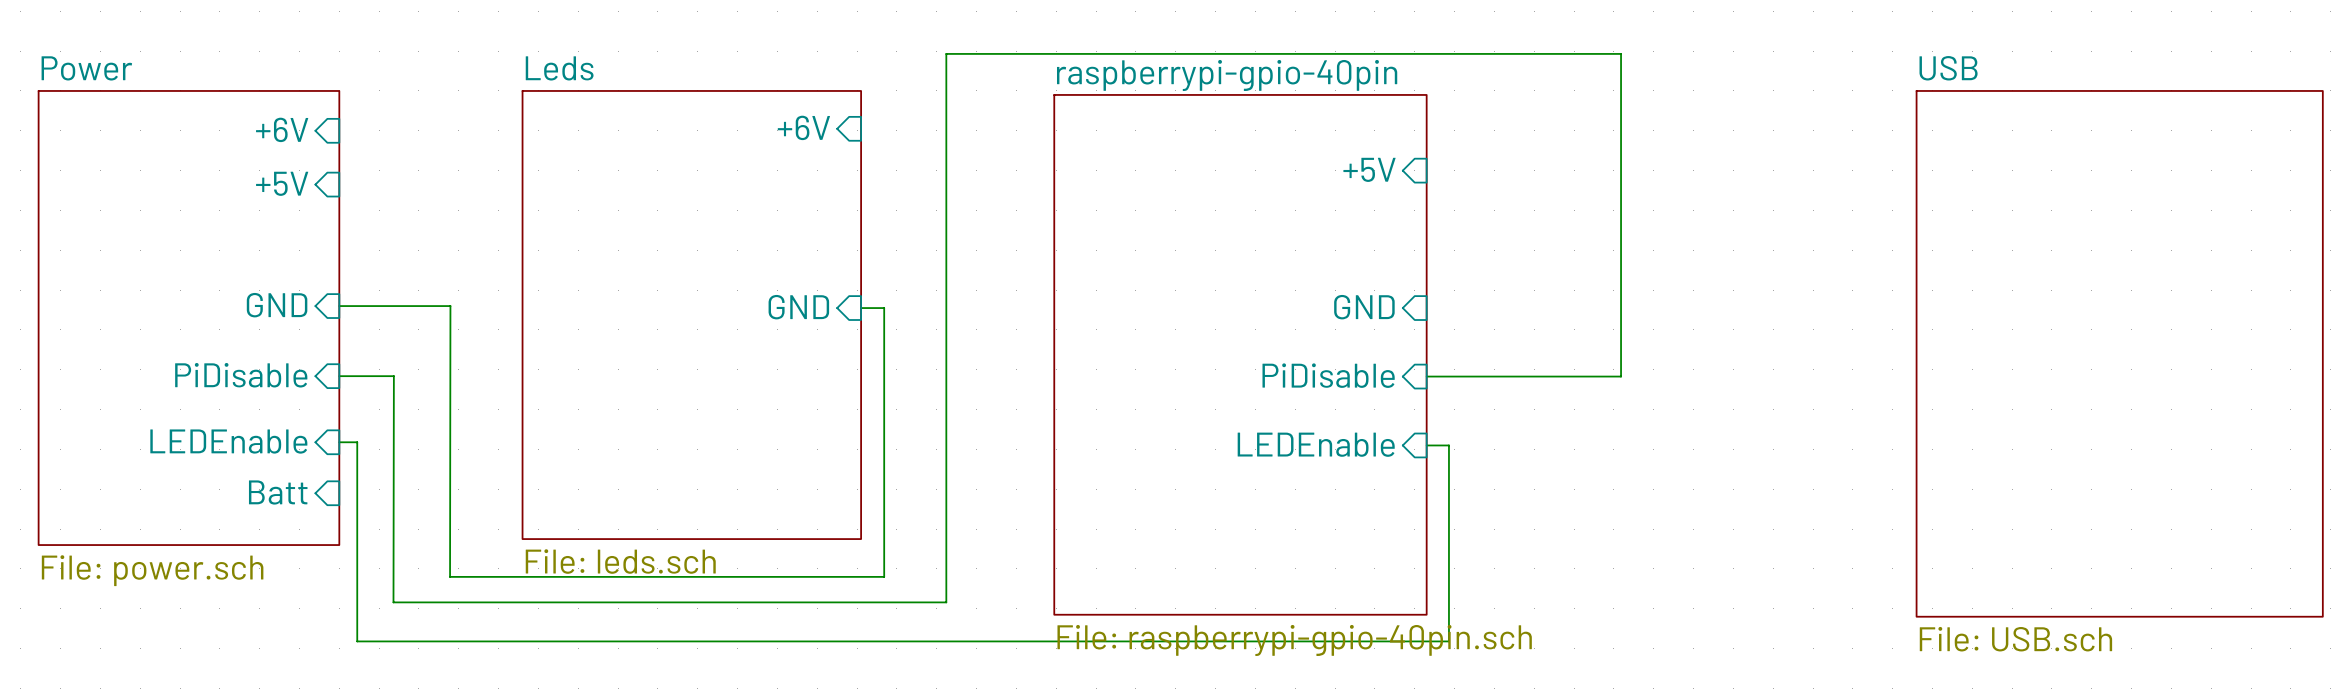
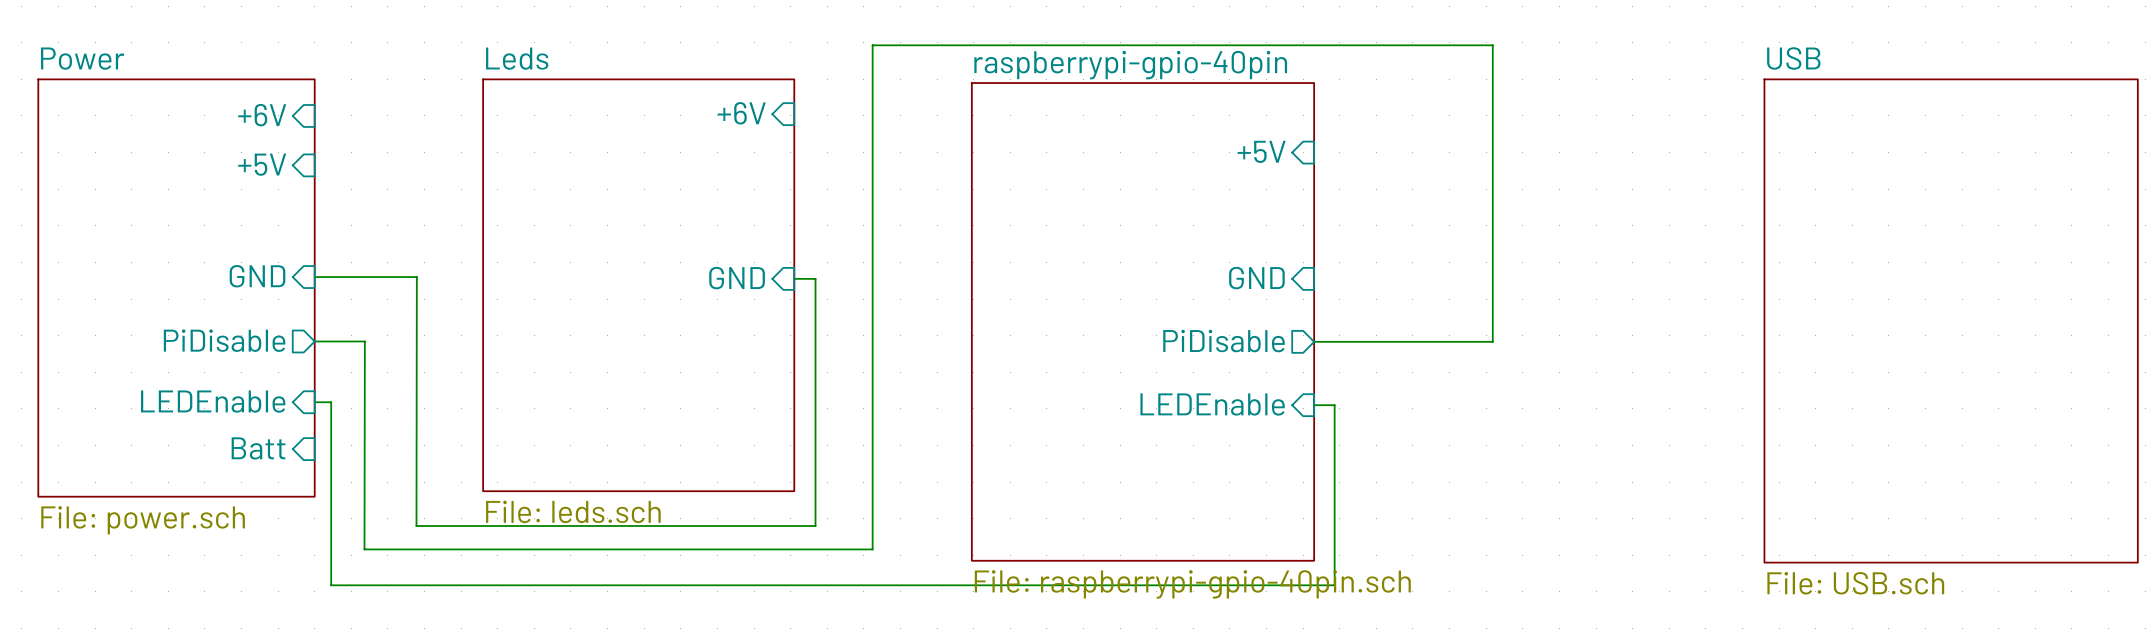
sheet pin shape: input (241, 375) -> output (224, 340)
sheet pin shape: input (1328, 375) -> output (1224, 341)

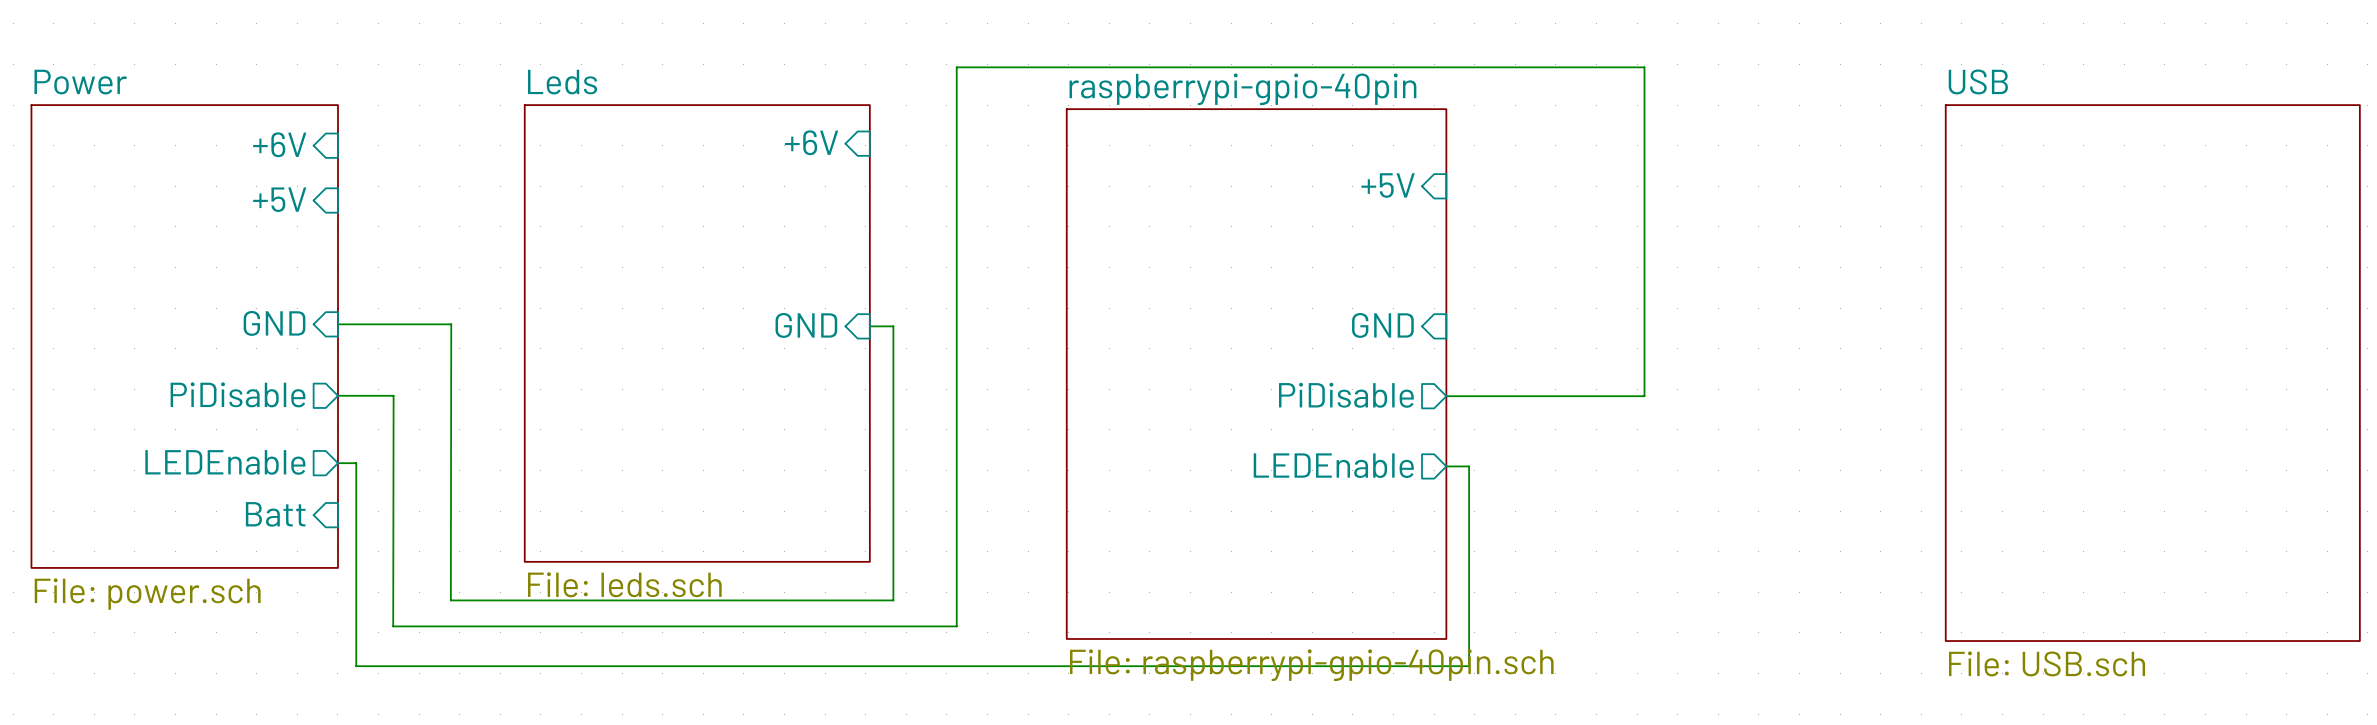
sheet pin shape: input (213, 401) -> output (225, 462)
sheet pin shape: input (1212, 404) -> output (1333, 465)

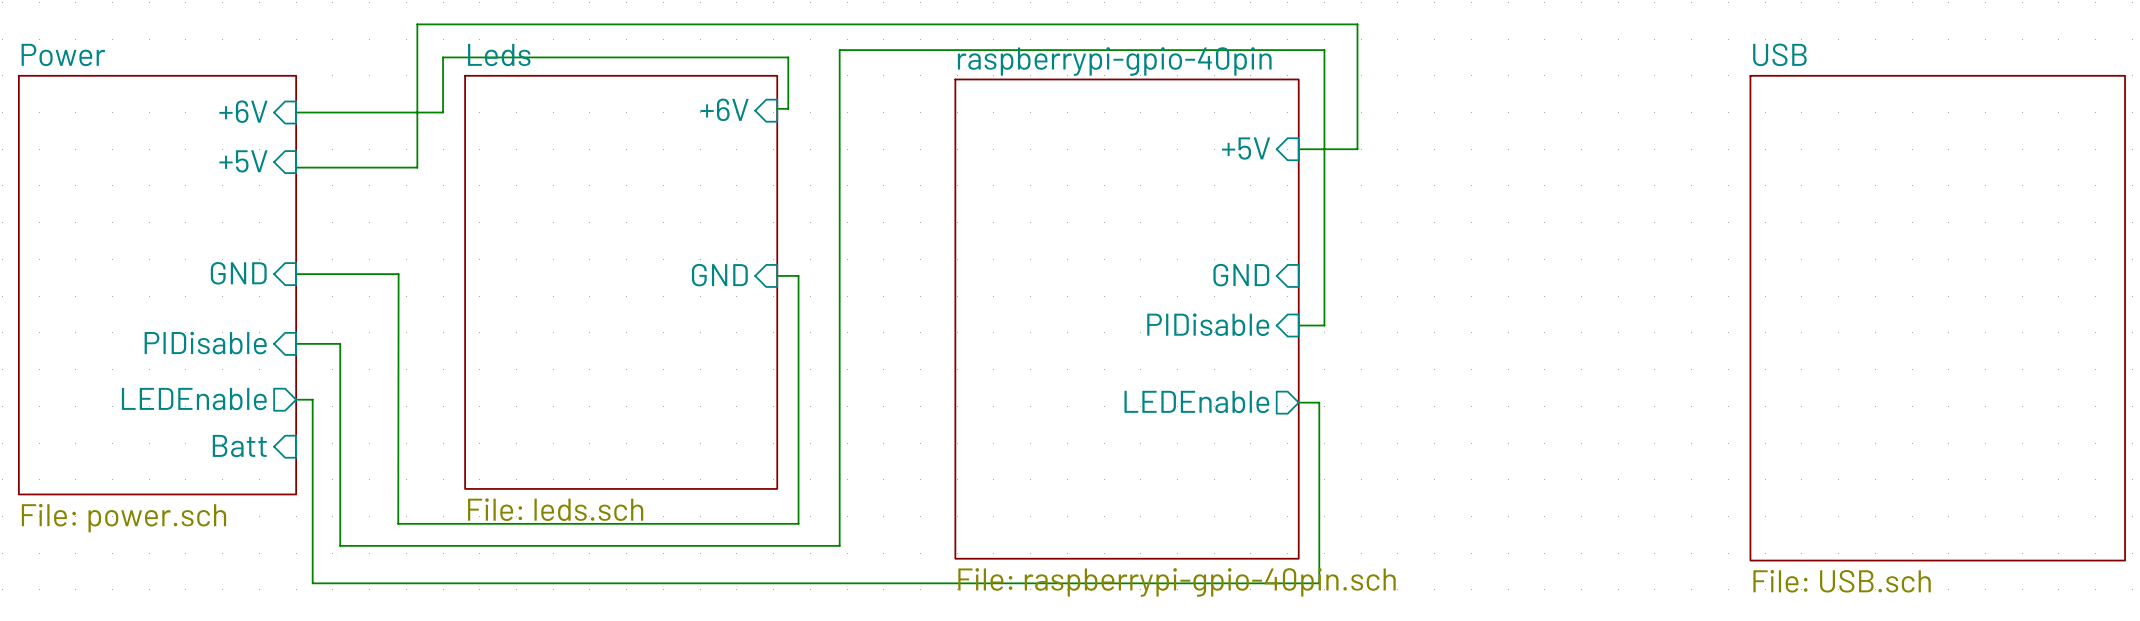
wire: none -> (777, 108) (788, 108) (788, 57) (443, 57) (443, 112) (296, 112)
wire: none -> (1298, 149) (1357, 149) (1357, 24) (417, 24) (417, 167) (296, 167)
wire: none -> (1298, 325) (1324, 325) (1324, 50) (839, 50) (839, 545) (340, 545) (340, 343) (296, 343)
sheet pin shape: output (238, 394) -> input (205, 343)
sheet pin: PiDisable (238, 394) -> PIDisable (205, 343)
wire: (337, 395) (393, 395) (393, 626) (956, 626) (956, 67) (1644, 67) (1644, 396) (1446, 396) -> none
sheet pin shape: output (1346, 395) -> input (1208, 324)
sheet pin: PiDisable (1346, 395) -> PIDisable (1208, 324)

